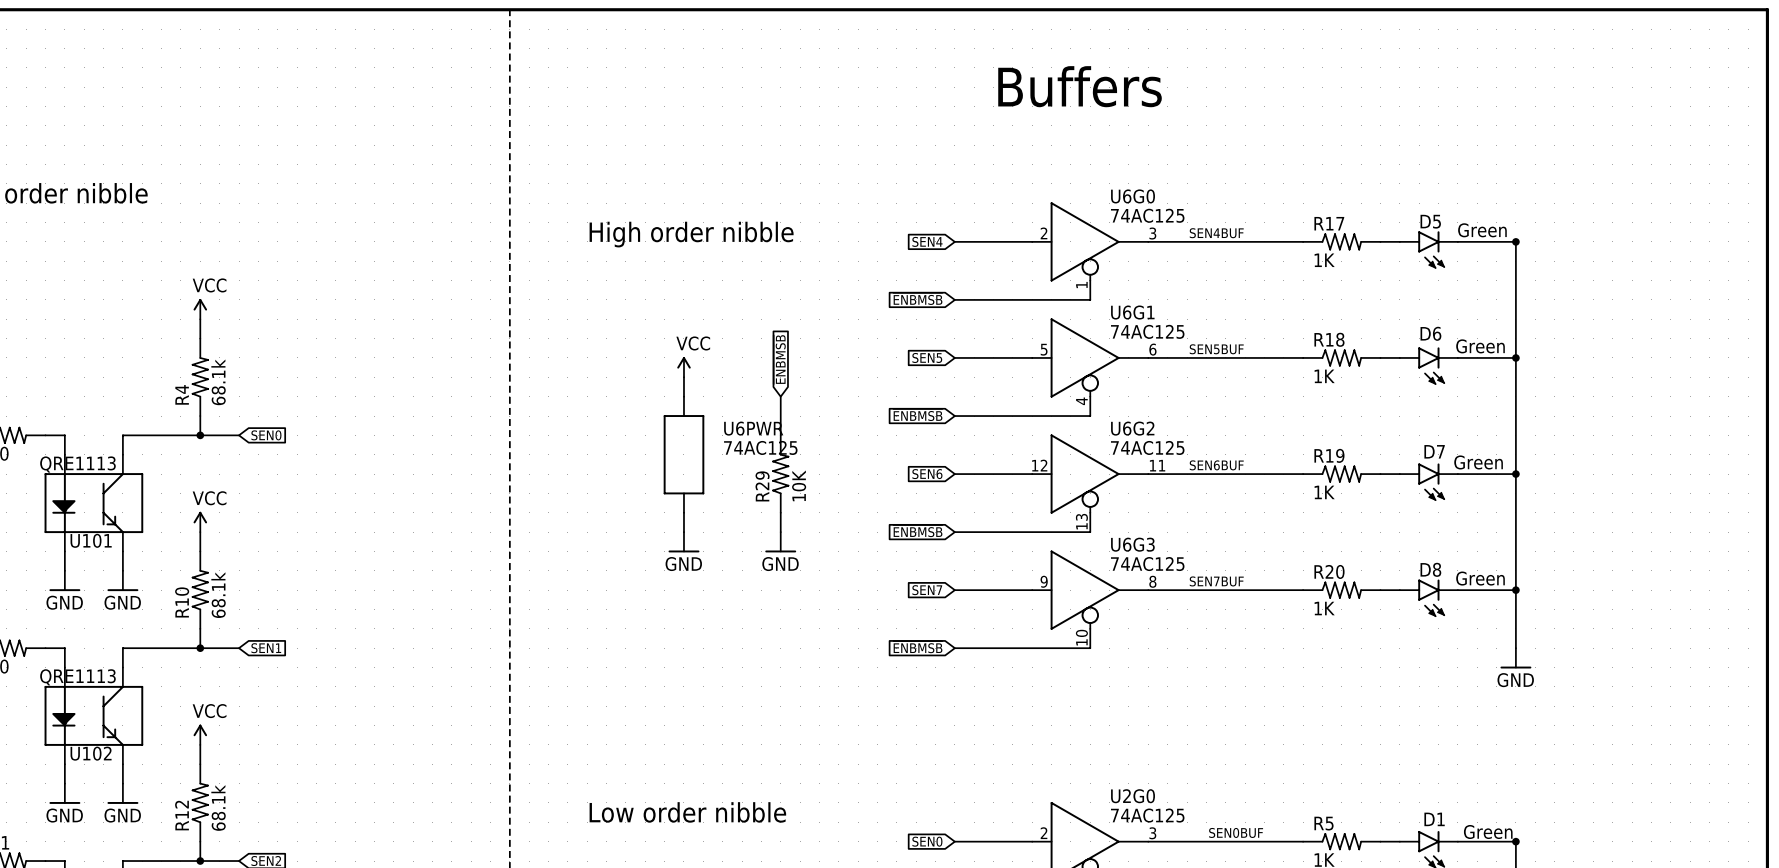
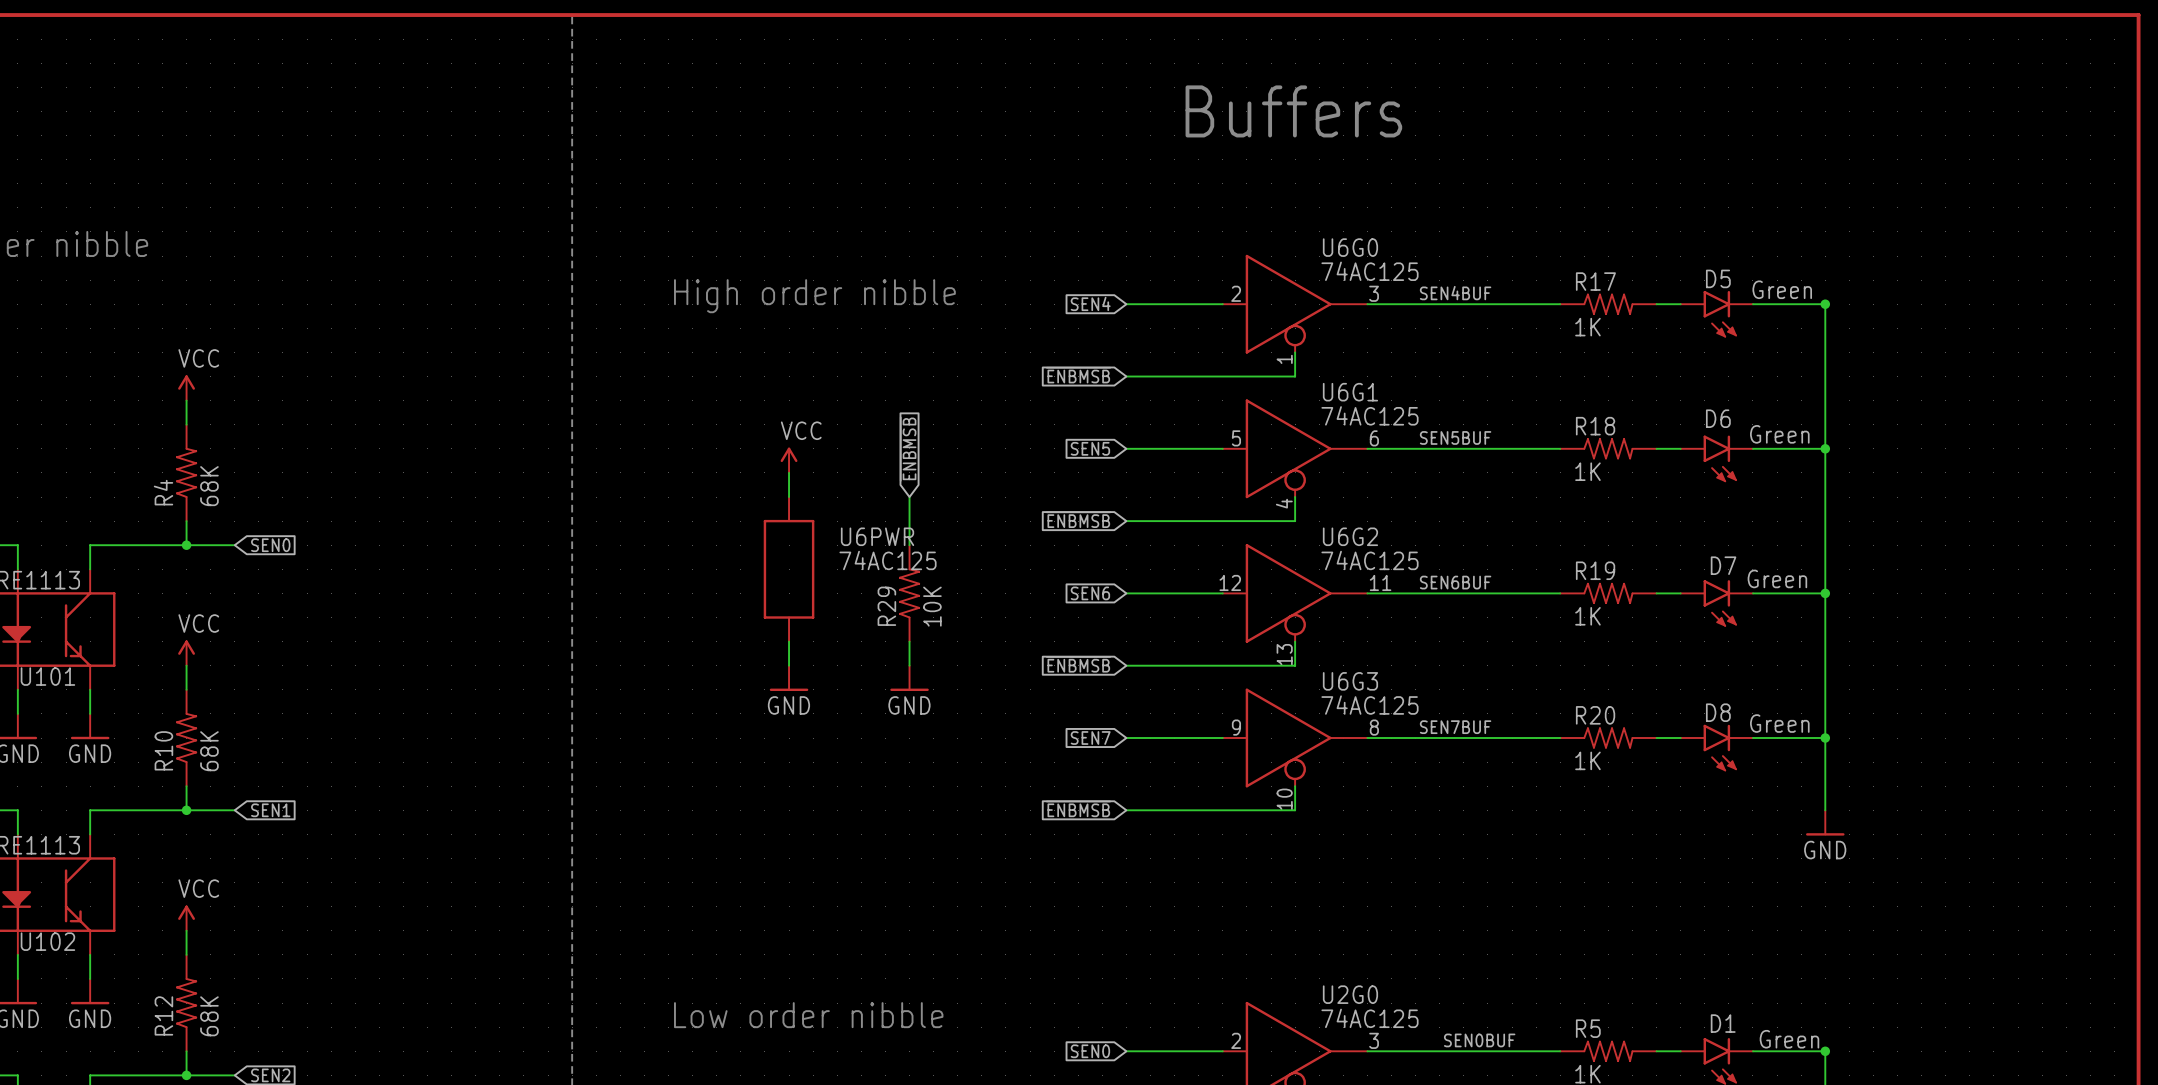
R4 value: 68.1k (218, 382) -> 68K (209, 486)
R10 value: 68.1k (218, 595) -> 68K (209, 751)
R12 value: 68.1k (218, 807) -> 68K (209, 1016)

